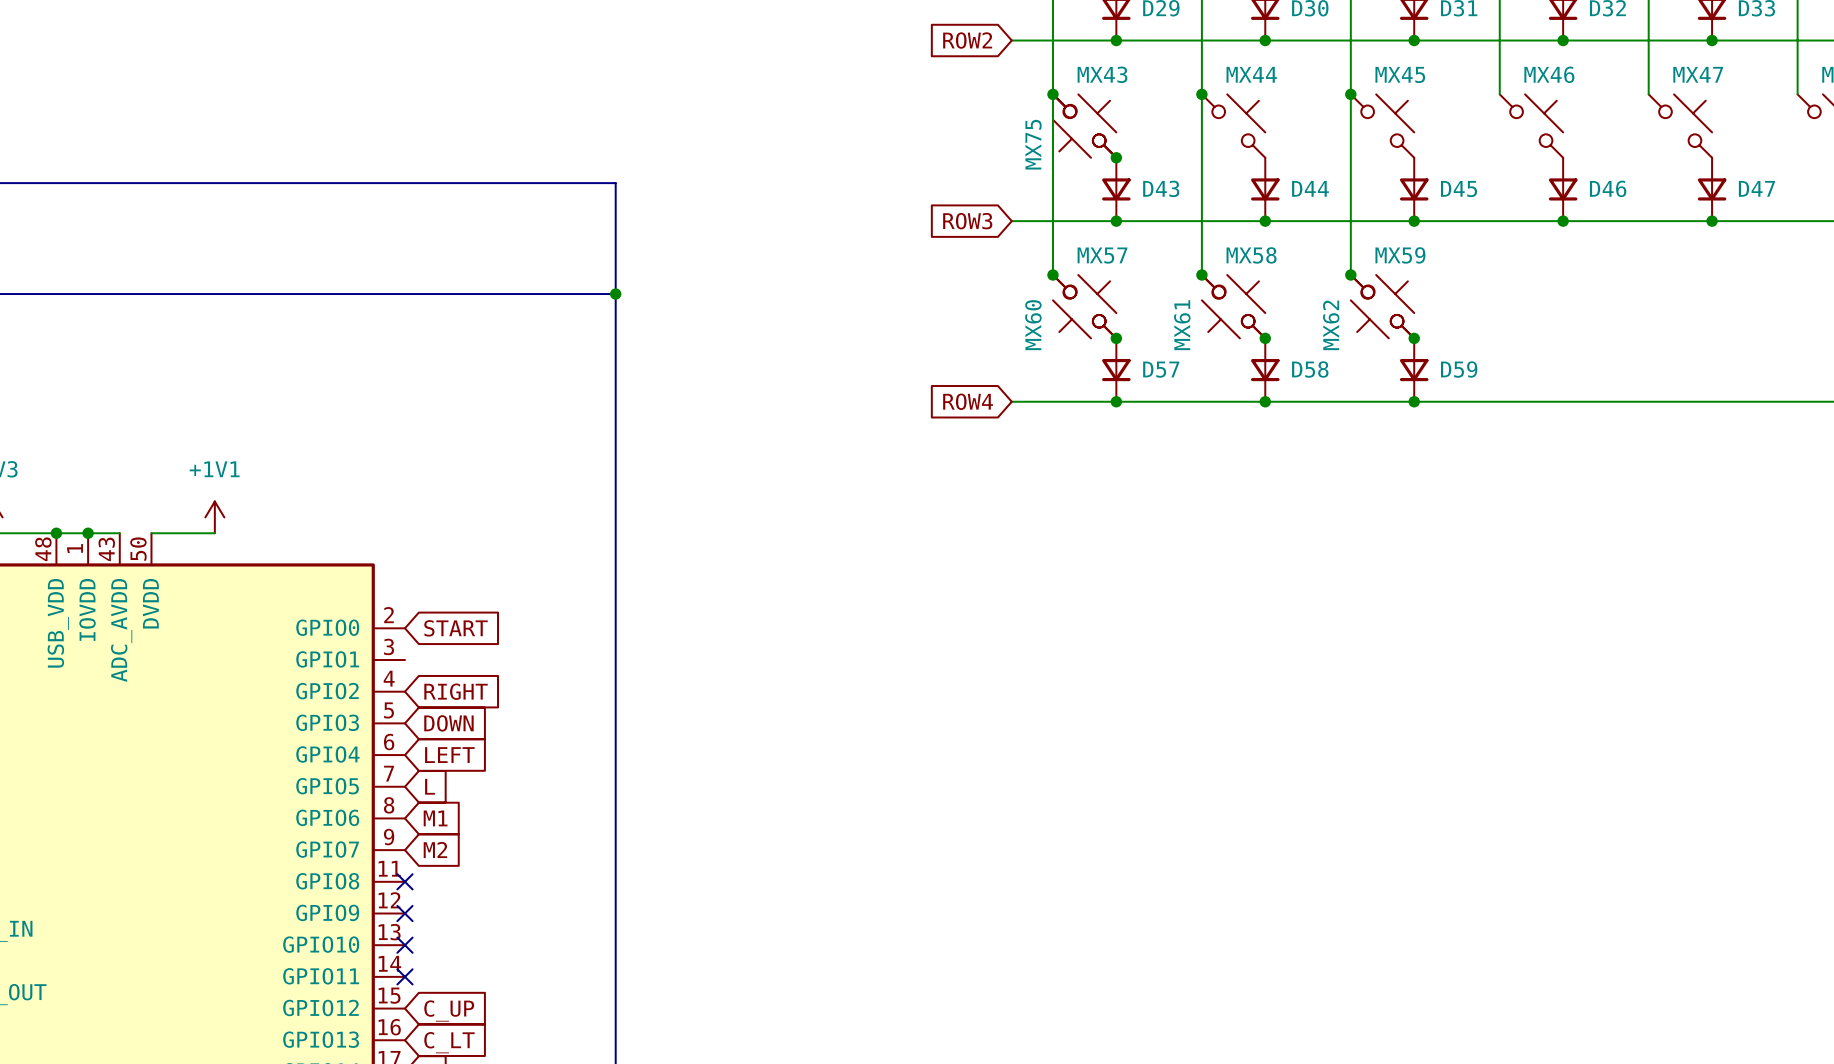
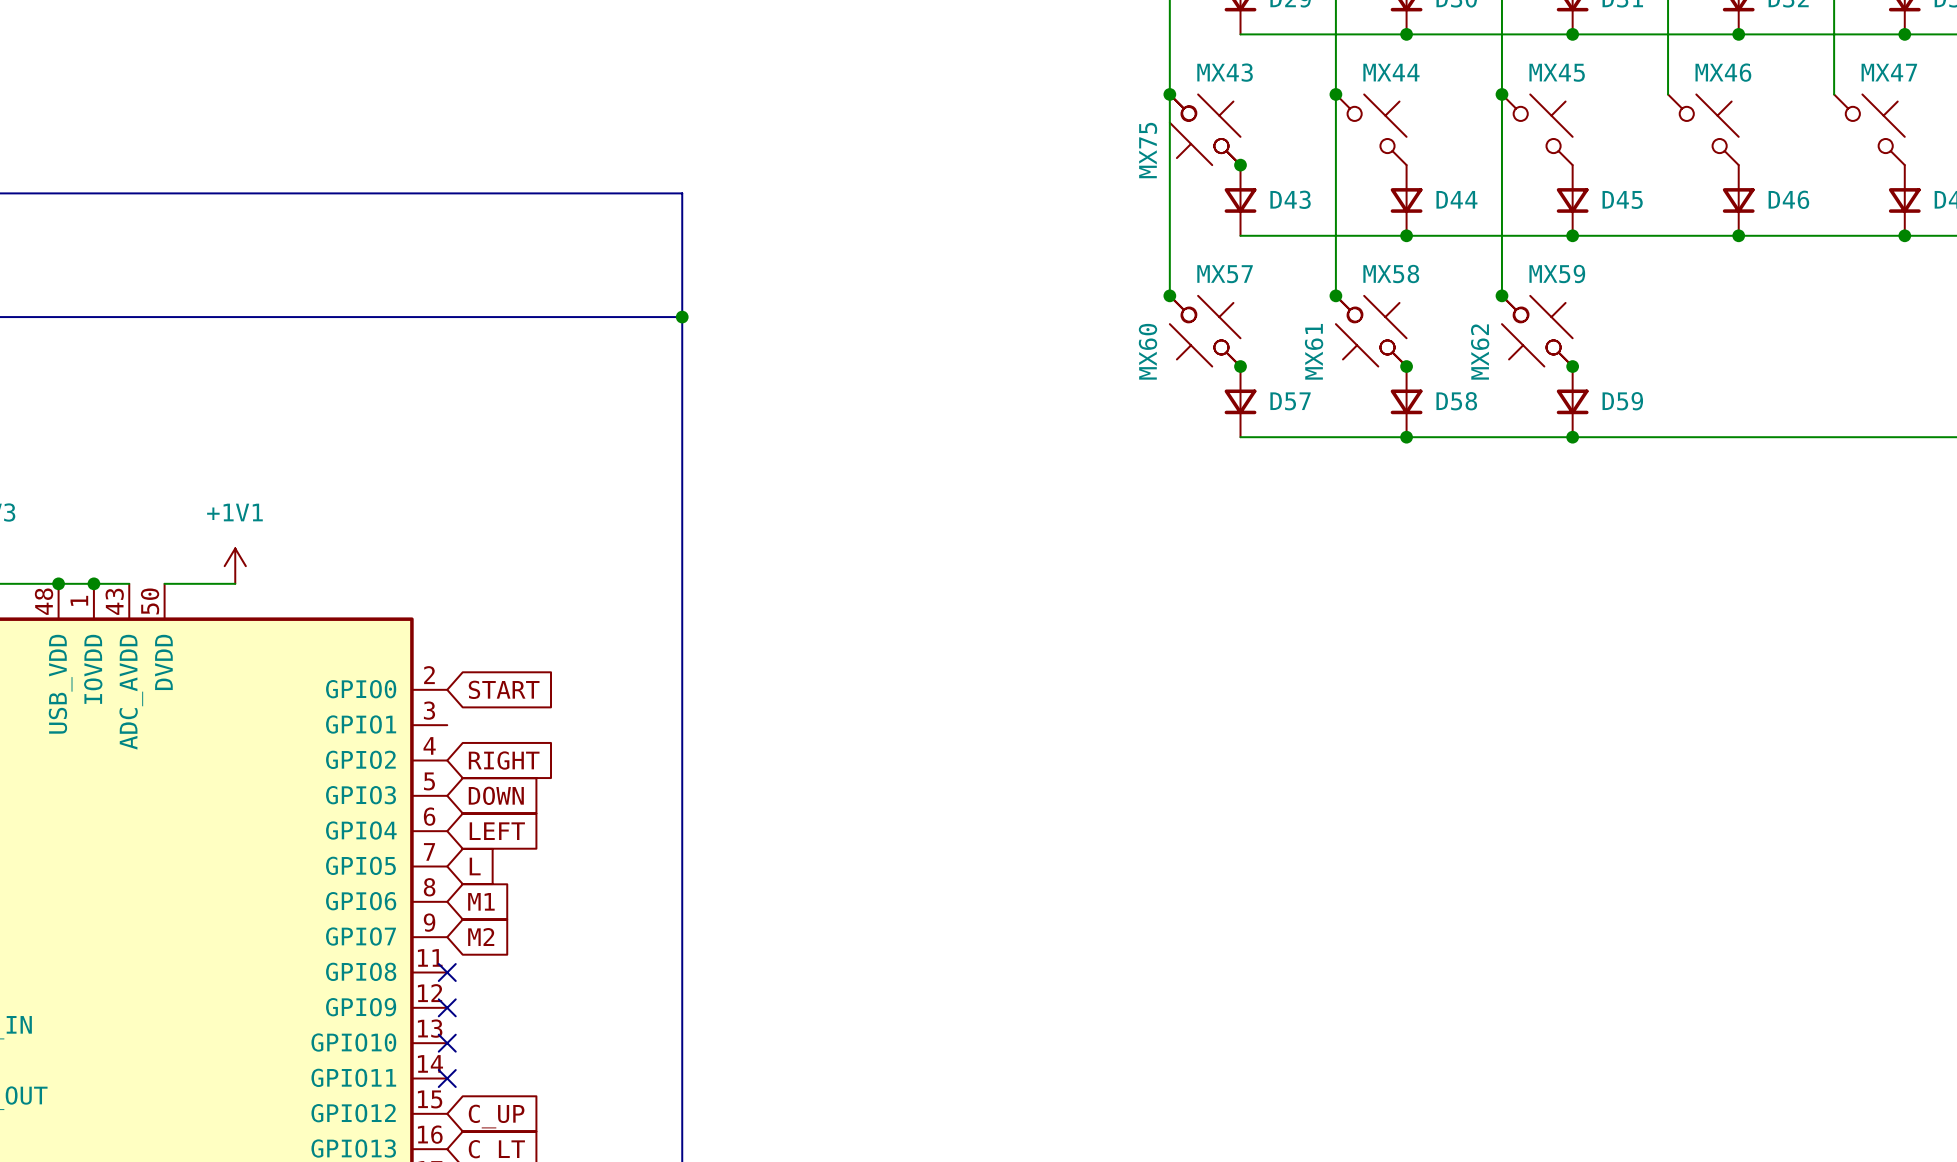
global label: ROW2 (967, 40) -> none
wire: (1011, 40) (1116, 40) -> none
junction: (1116, 40) -> none
global label: ROW3 (967, 221) -> none
wire: (1011, 221) (1116, 221) -> none
junction: (1116, 221) -> none
global label: ROW4 (968, 401) -> none
wire: (1011, 401) (1116, 401) -> none
junction: (1116, 401) -> none

